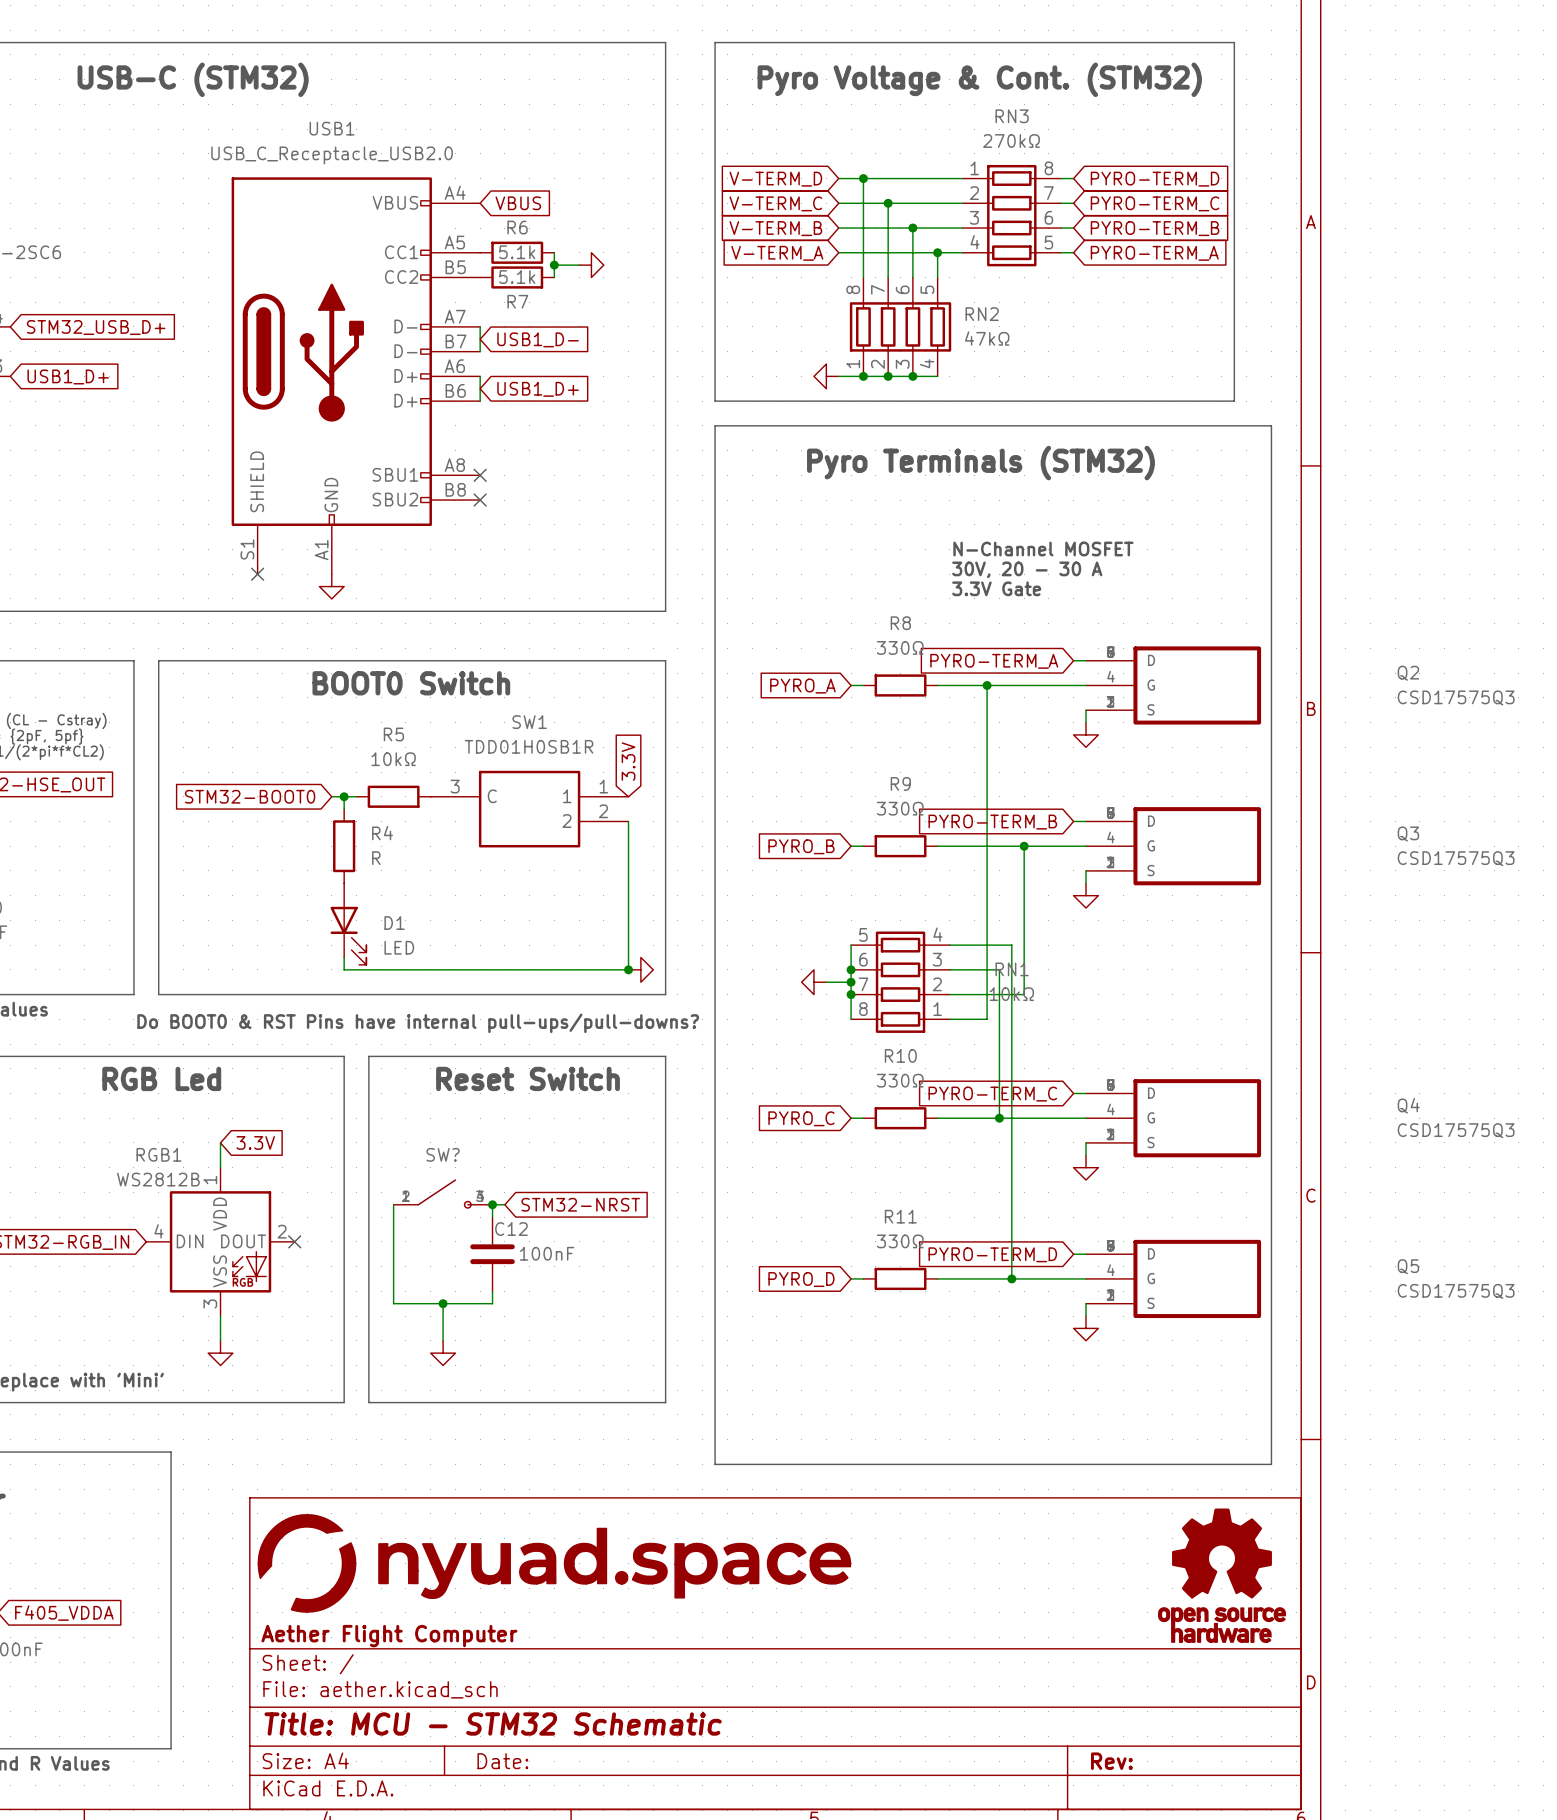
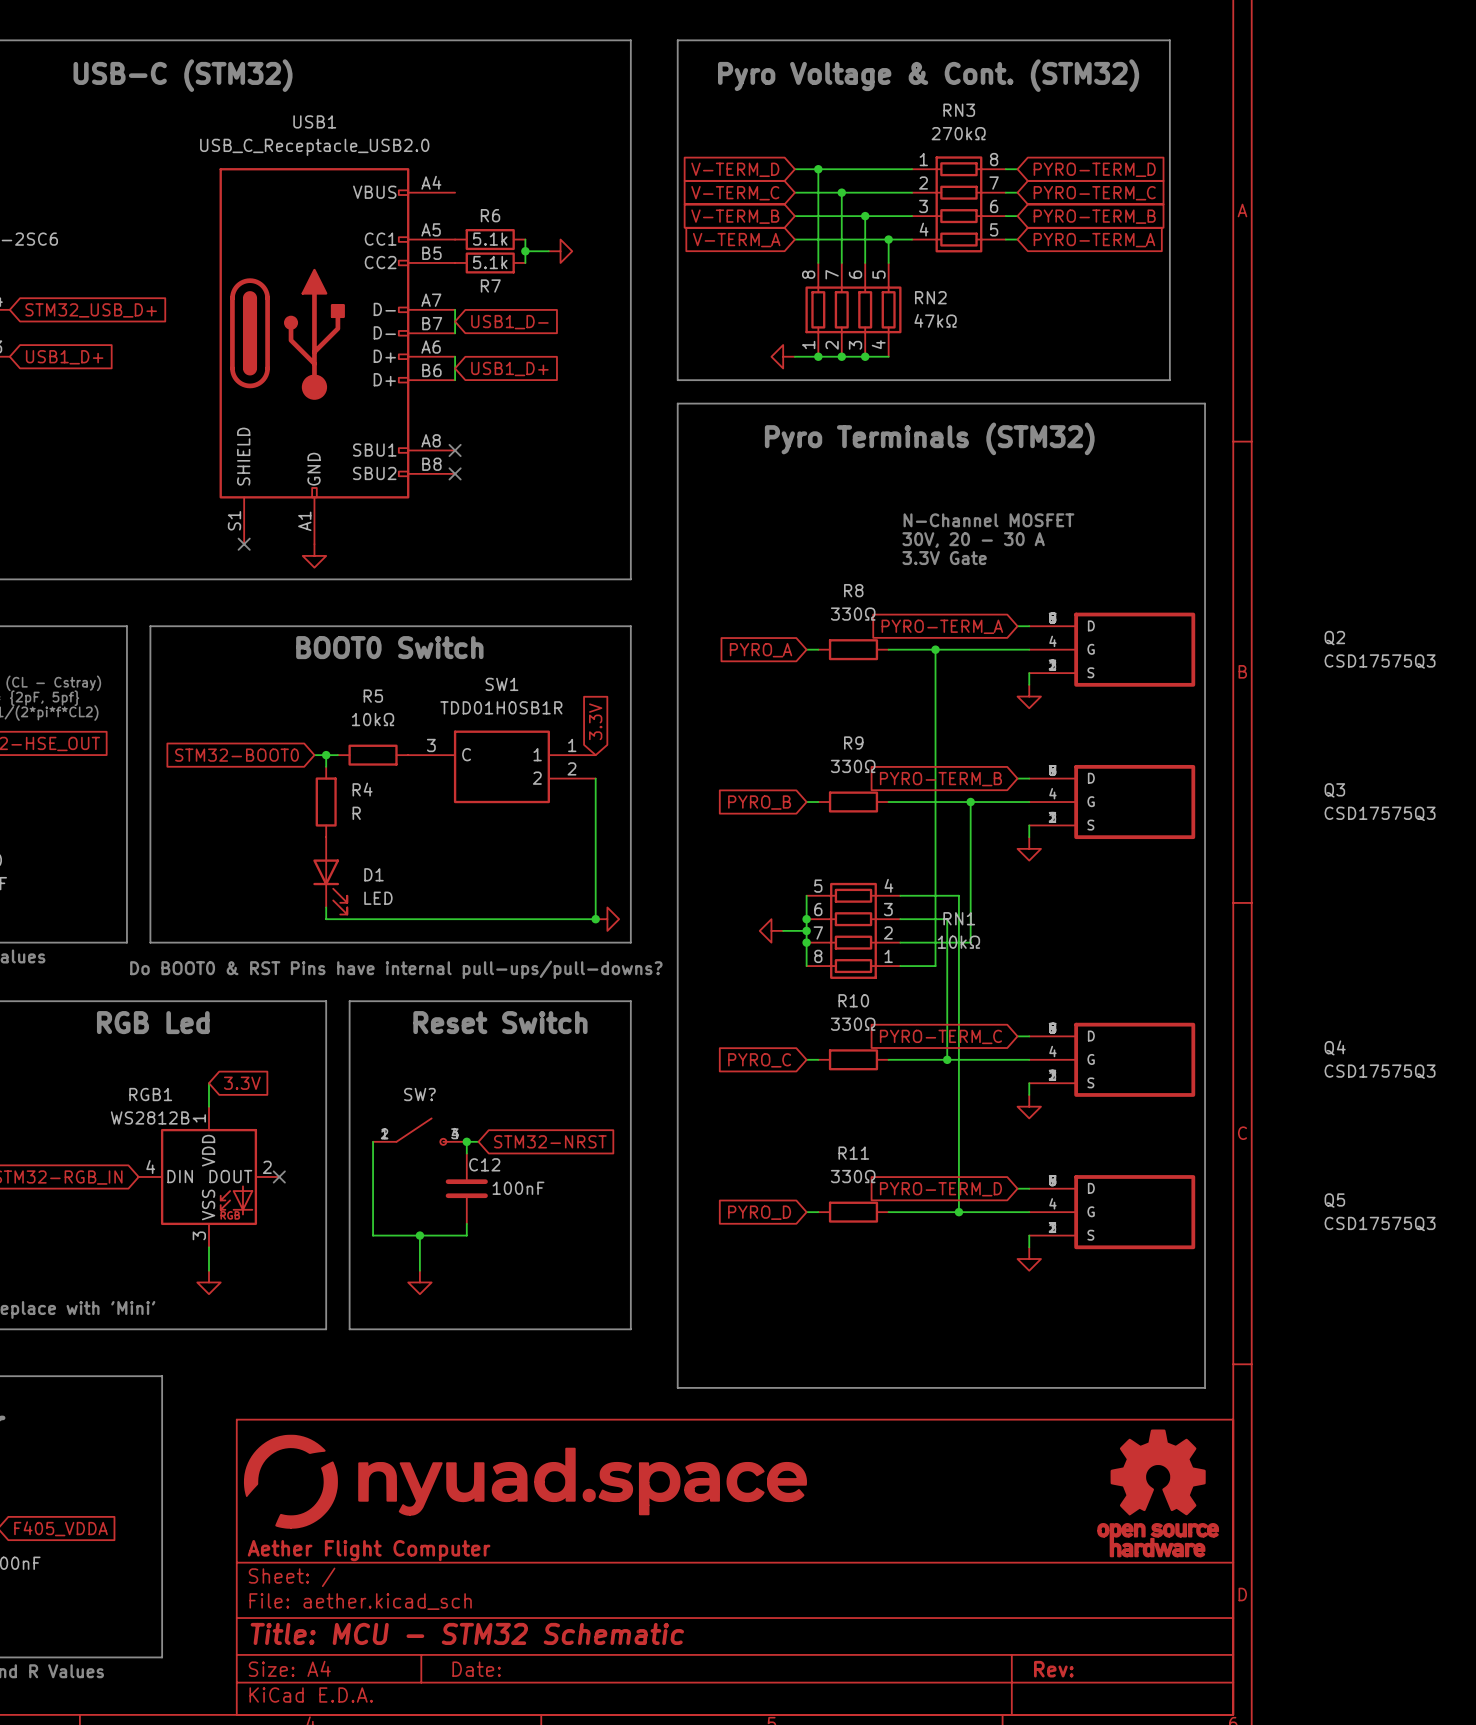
global label: VBUS (518, 203) -> none

